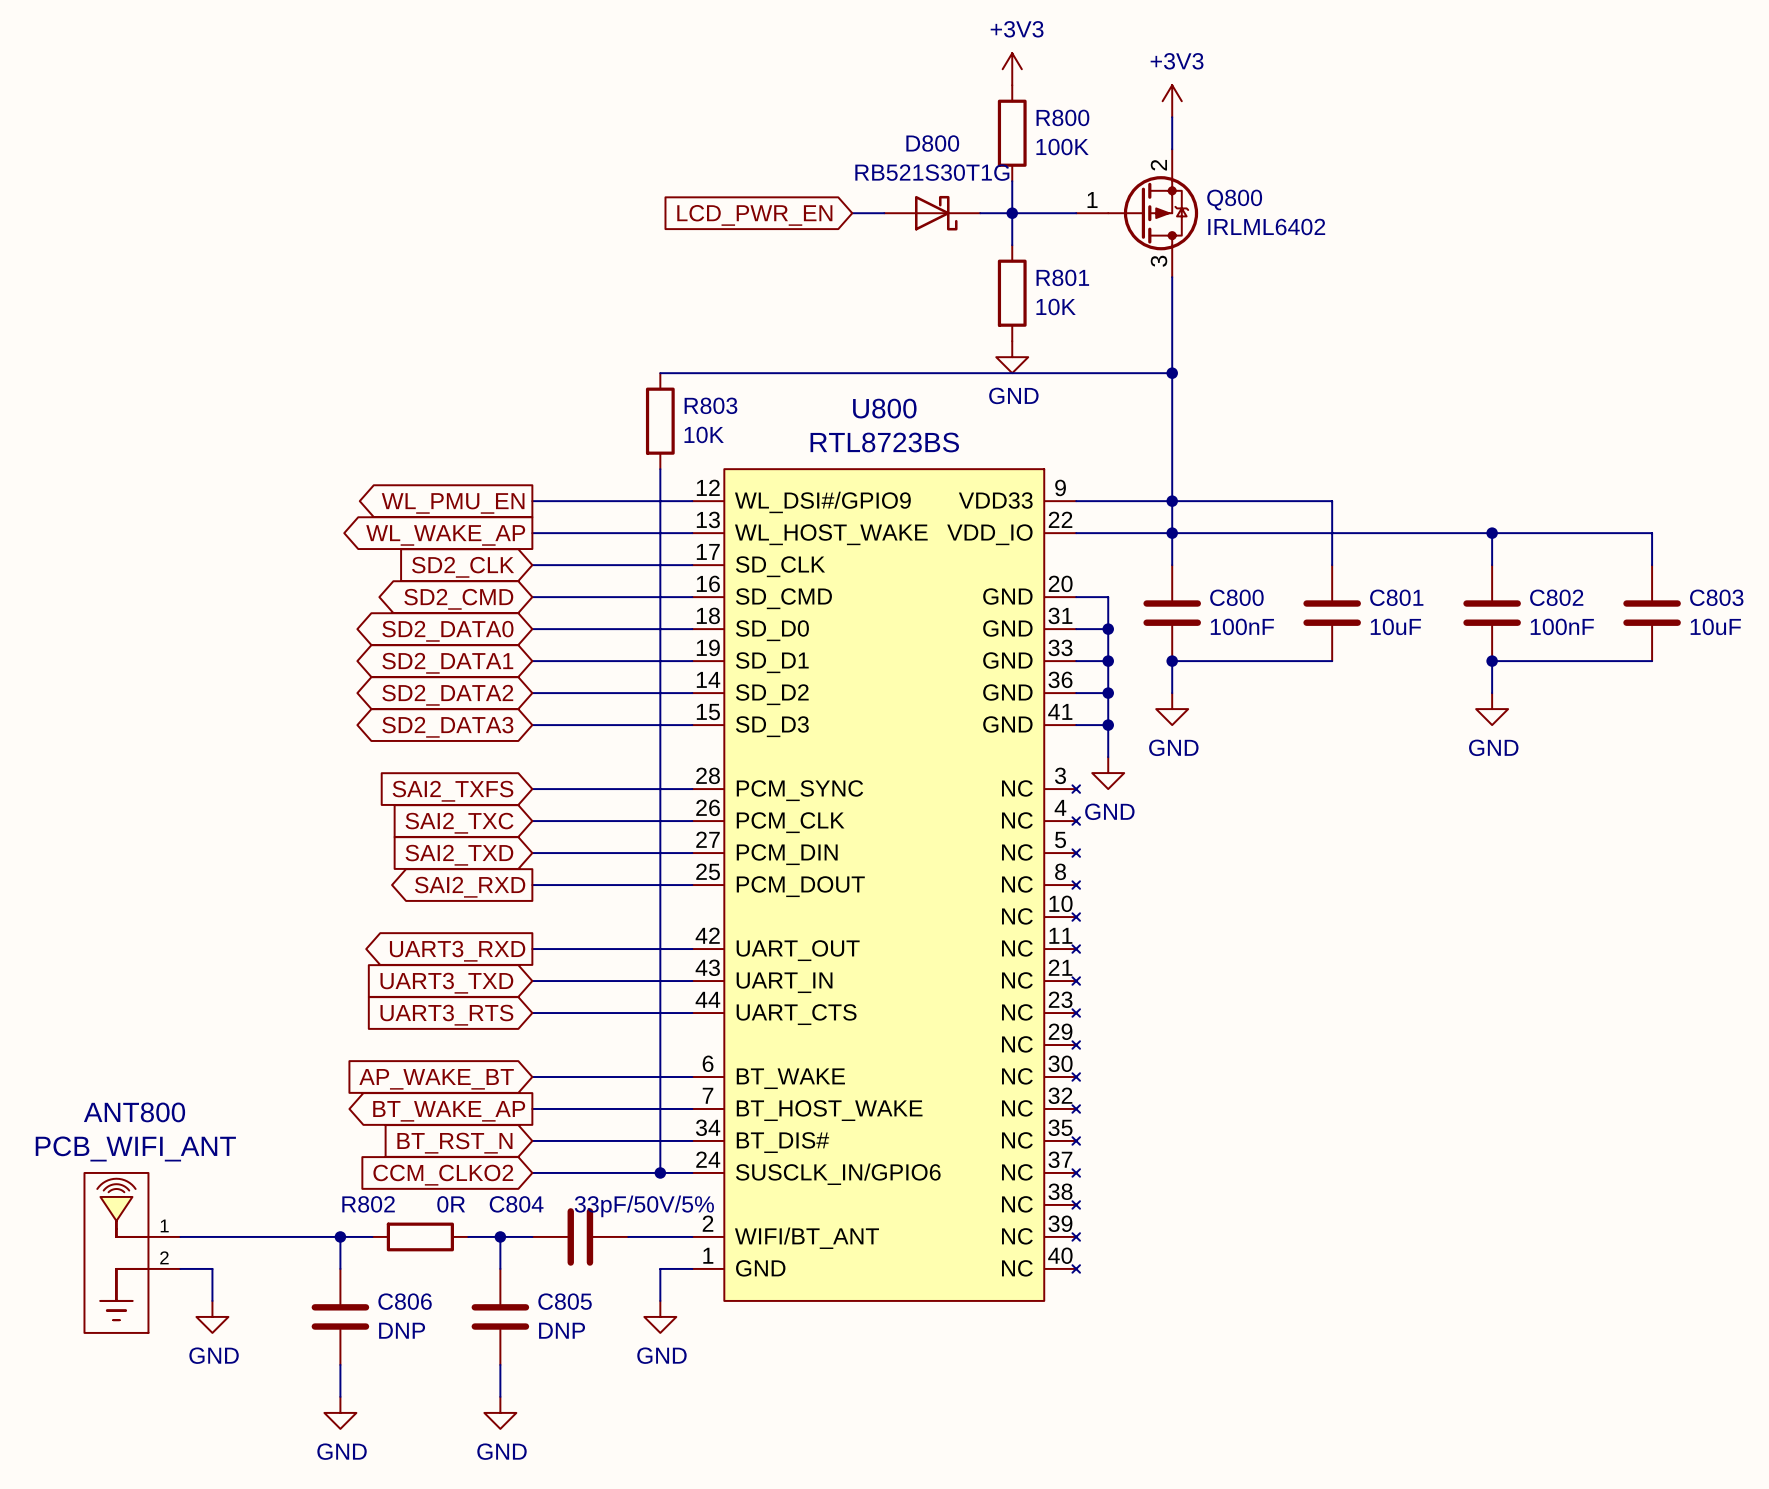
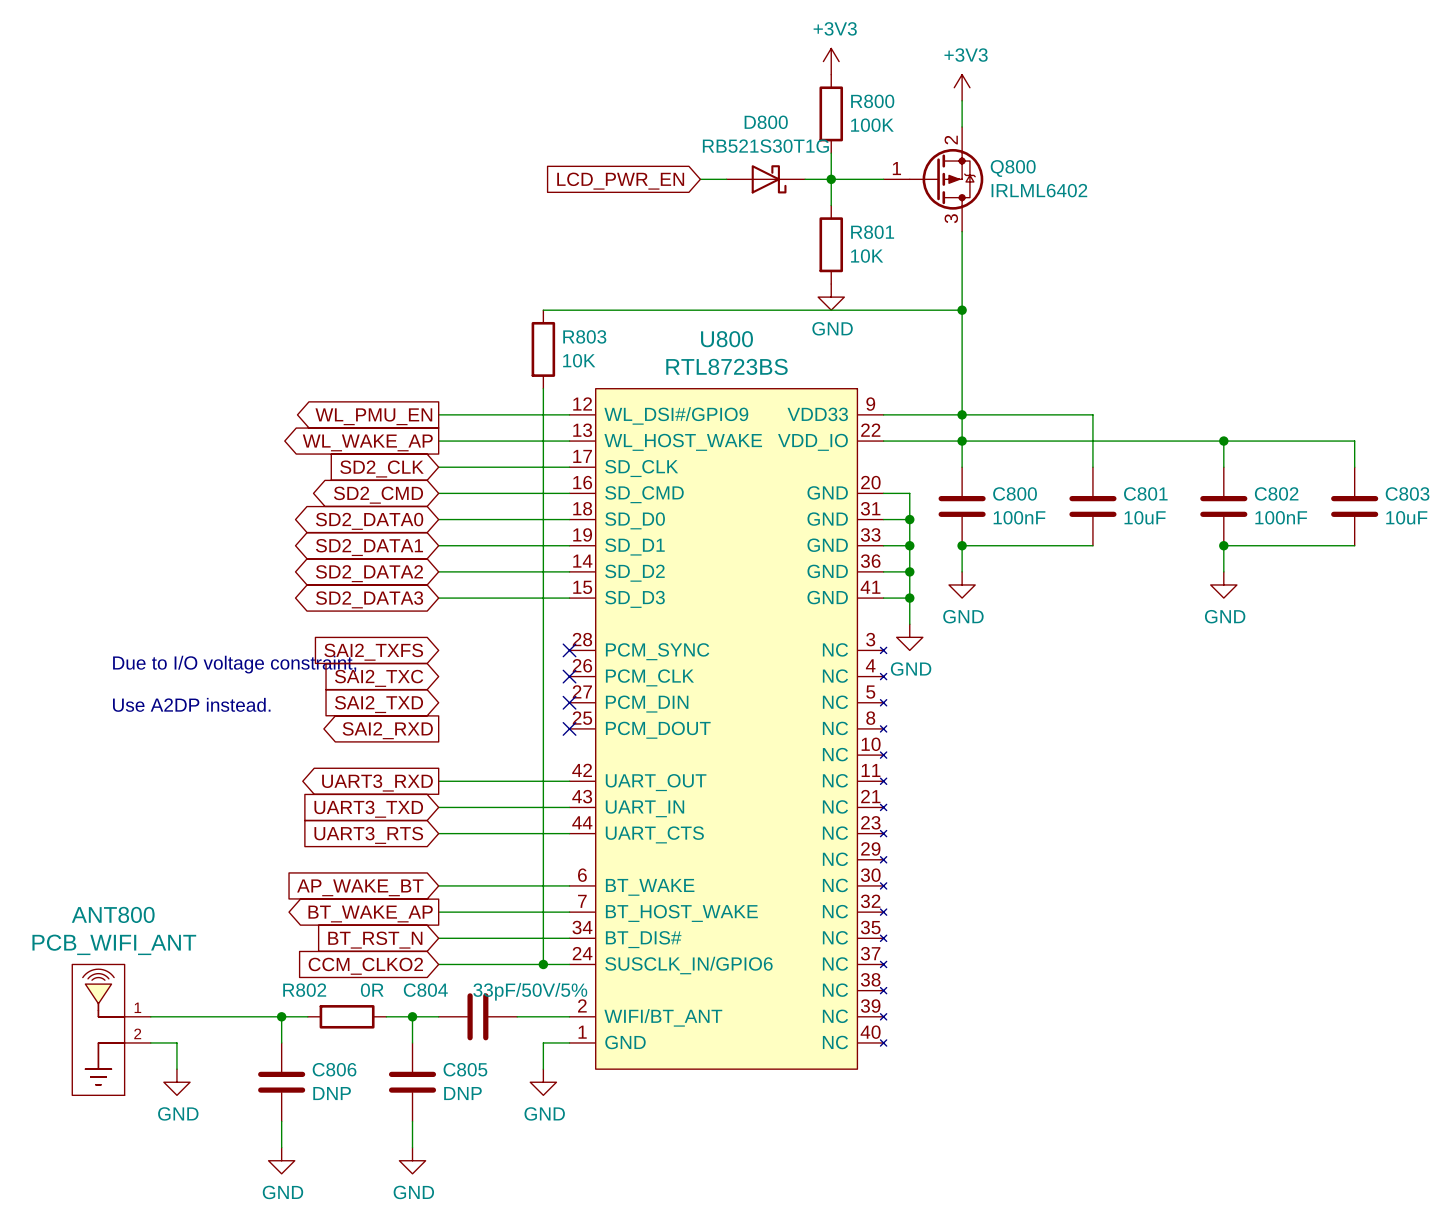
wire: (532, 789) (692, 789) -> none
no-connect mark: none -> (569, 650)
text: none -> Due to I/O voltage constraint, (234, 664)
wire: (532, 821) (692, 821) -> none
no-connect mark: none -> (569, 676)
wire: (532, 853) (692, 853) -> none
no-connect mark: none -> (569, 702)
text: none -> Use A2DP instead. (191, 704)
wire: (532, 885) (692, 885) -> none
no-connect mark: none -> (569, 728)

